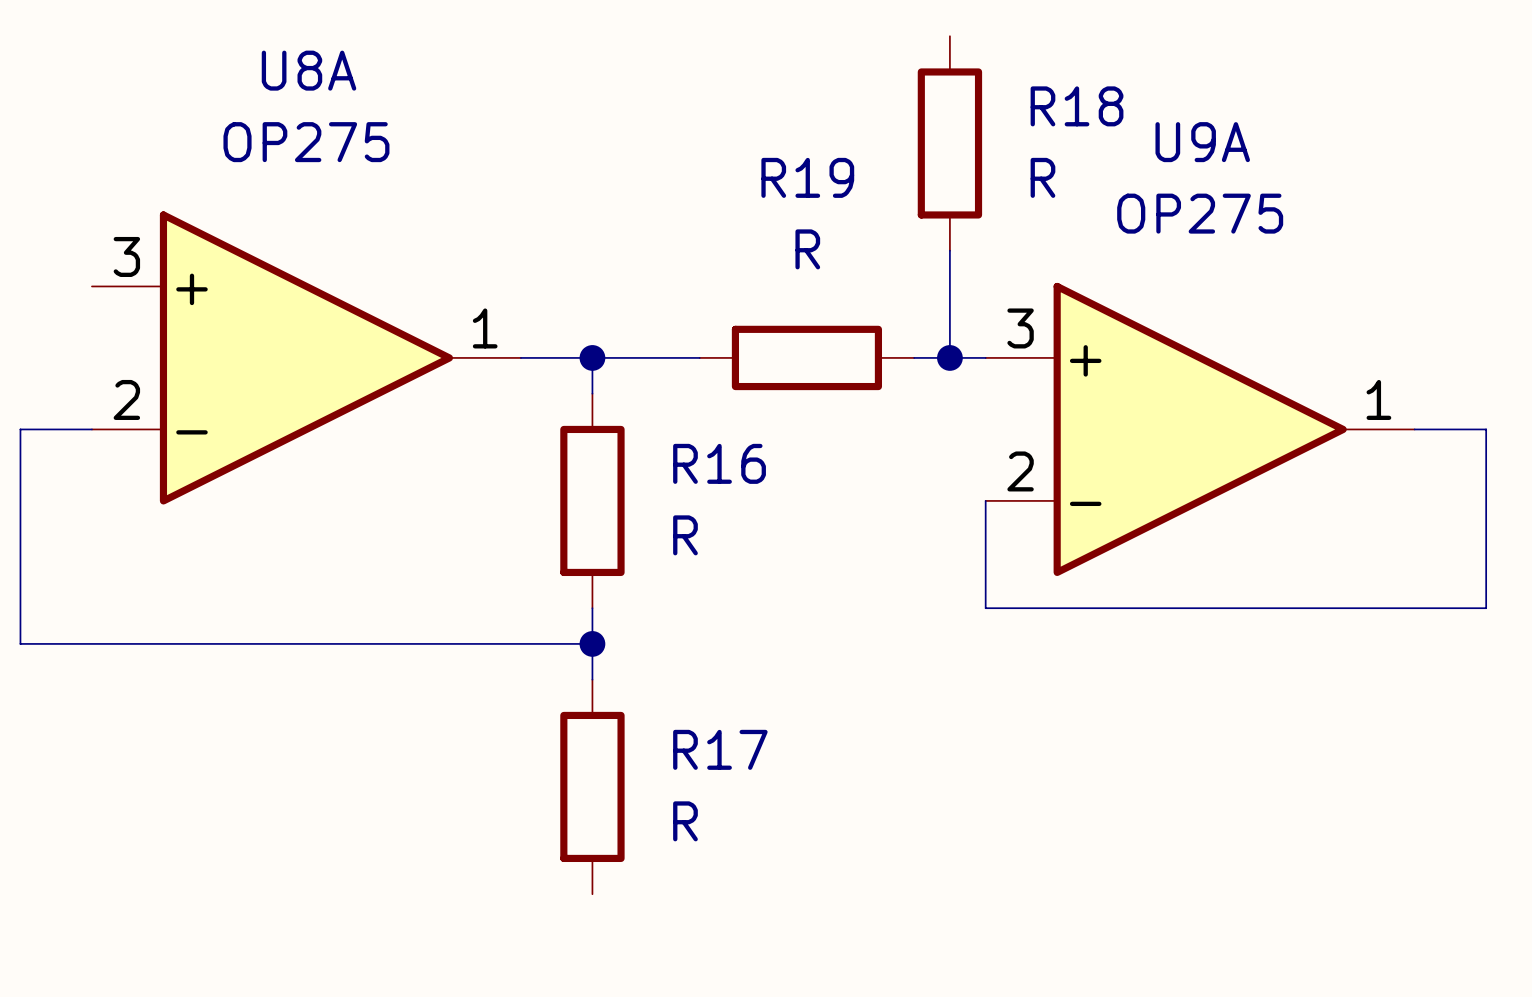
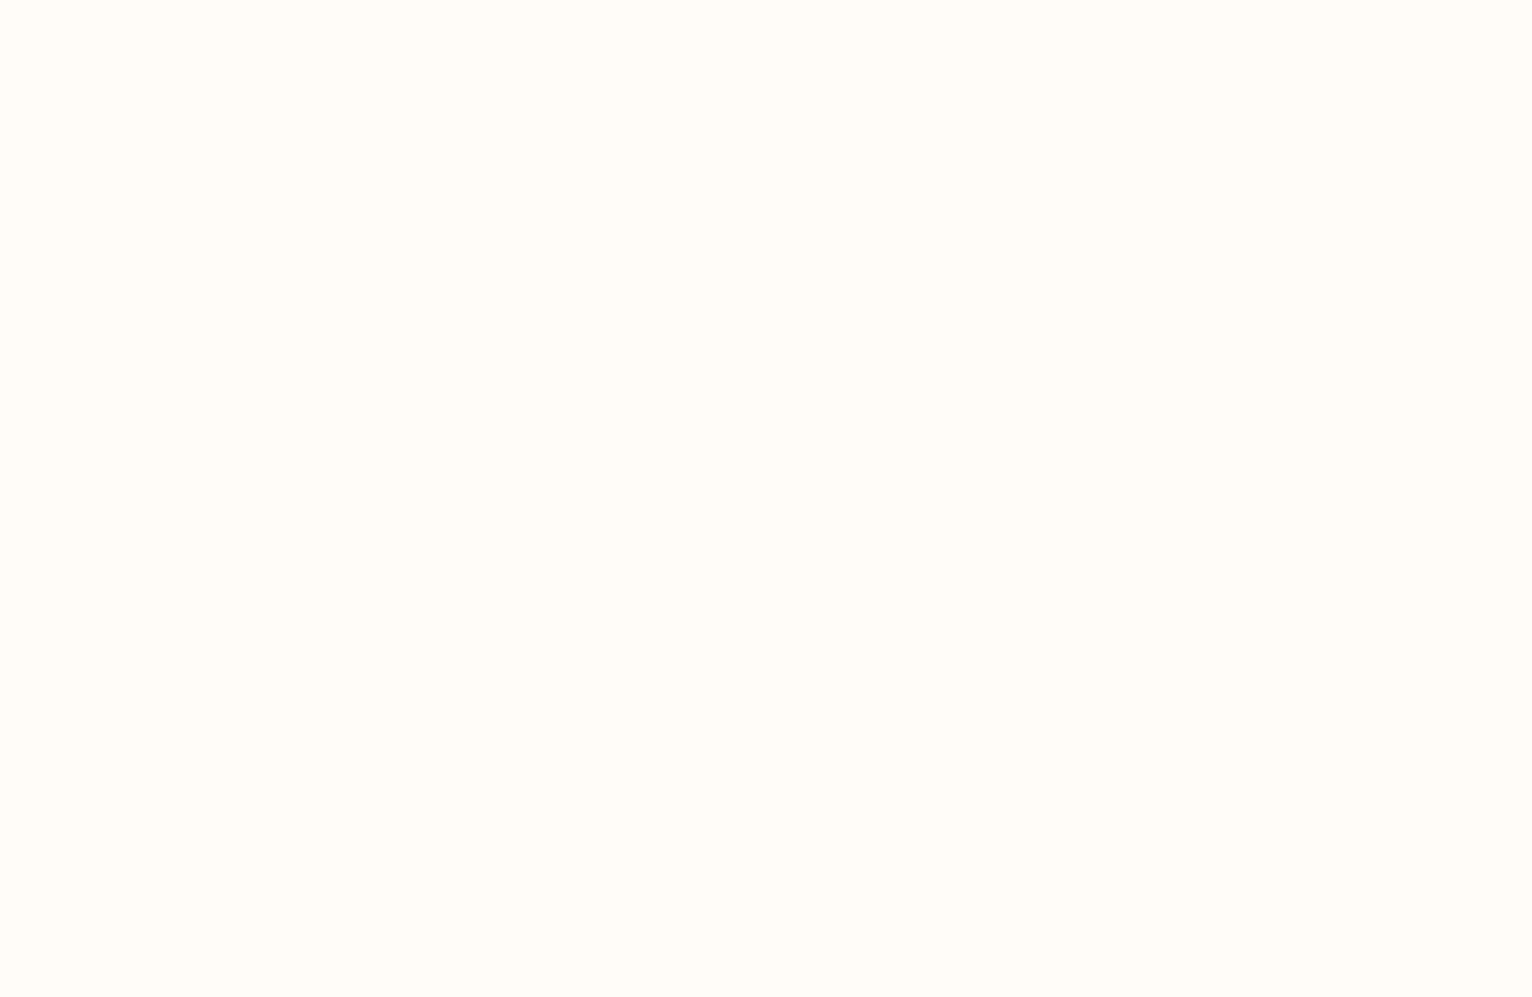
R18: R (949, 143) -> none
wire: (949, 250) (949, 357) -> none
U8A: OP275 (306, 357) -> none
wire: (520, 357) (699, 357) -> none
wire: (592, 357) (592, 393) -> none
junction: (592, 357) -> none
R19: R (806, 357) -> none
wire: (914, 357) (985, 357) -> none
junction: (949, 357) -> none
wire: (91, 429) (20, 429) (20, 643) (592, 643) -> none
U9A: OP275 (1200, 429) -> none
wire: (1414, 429) (1486, 429) (1486, 608) (985, 608) (985, 500) -> none
R16: R (592, 500) -> none
wire: (592, 608) (592, 679) -> none
junction: (592, 643) -> none
R17: R (592, 786) -> none

